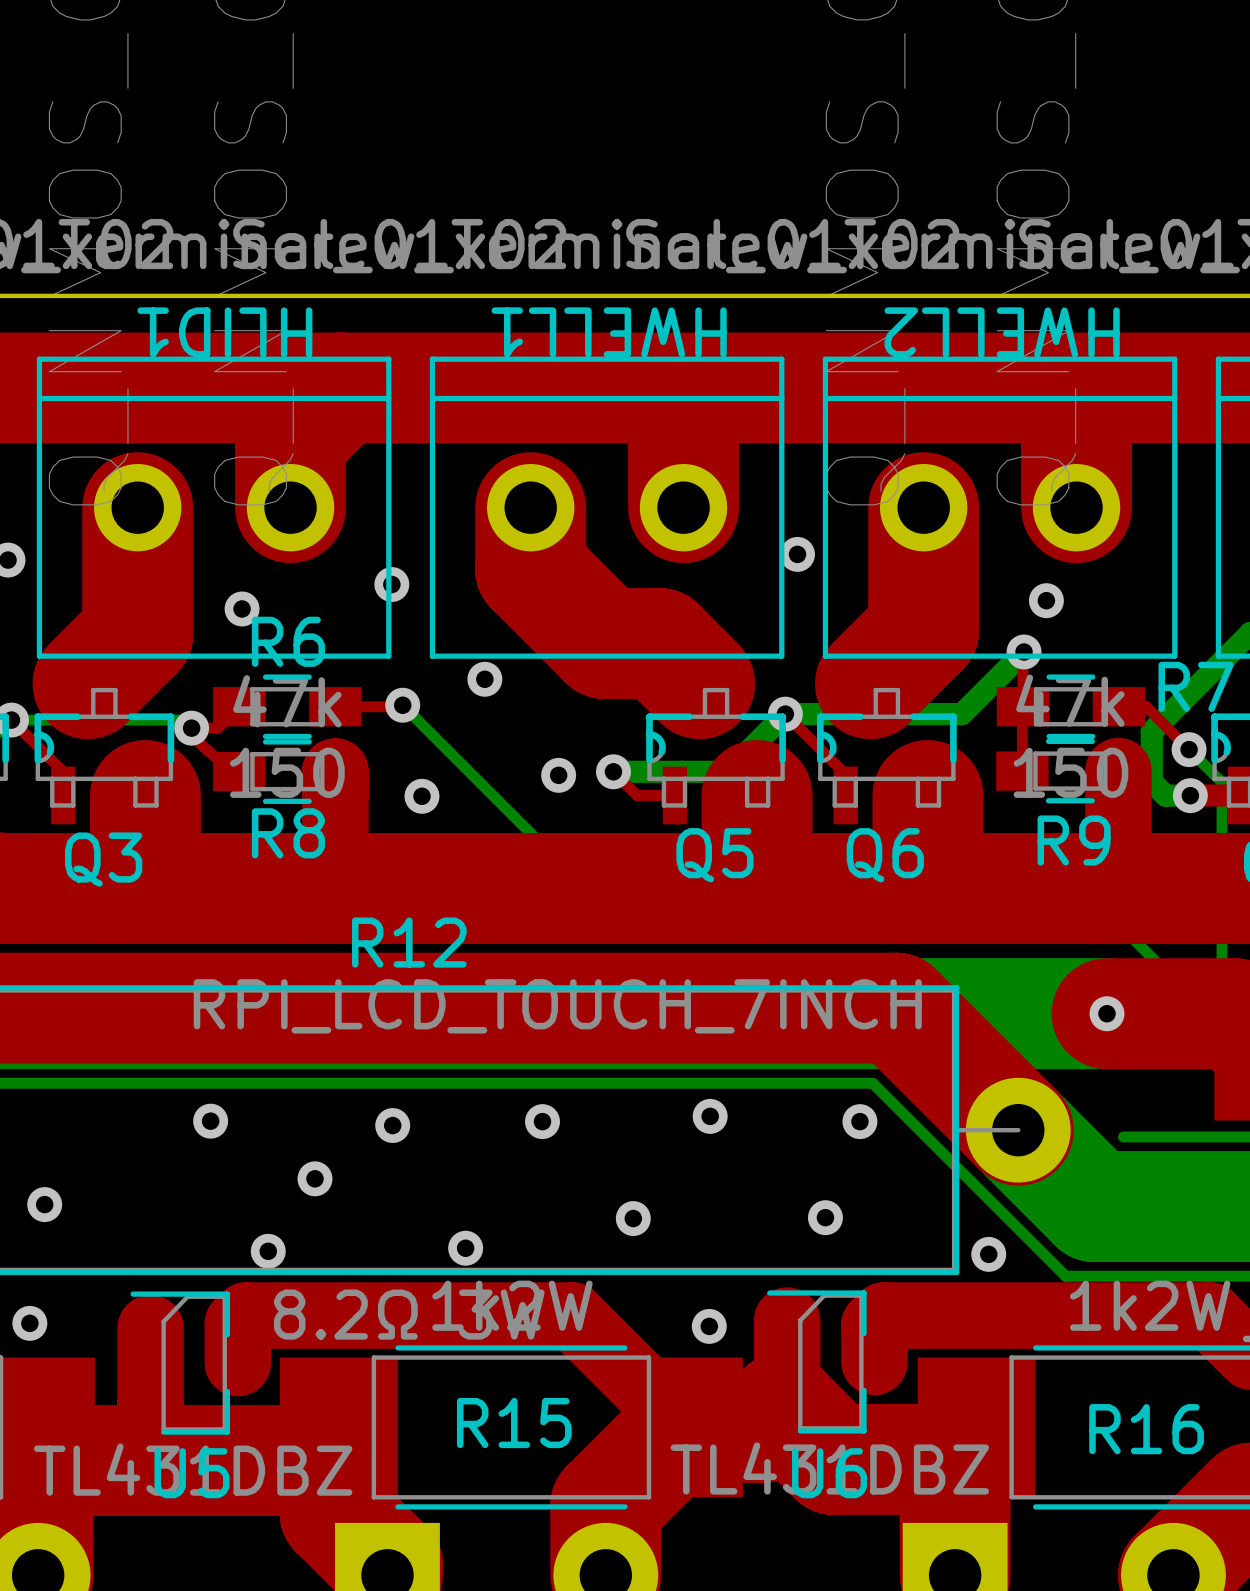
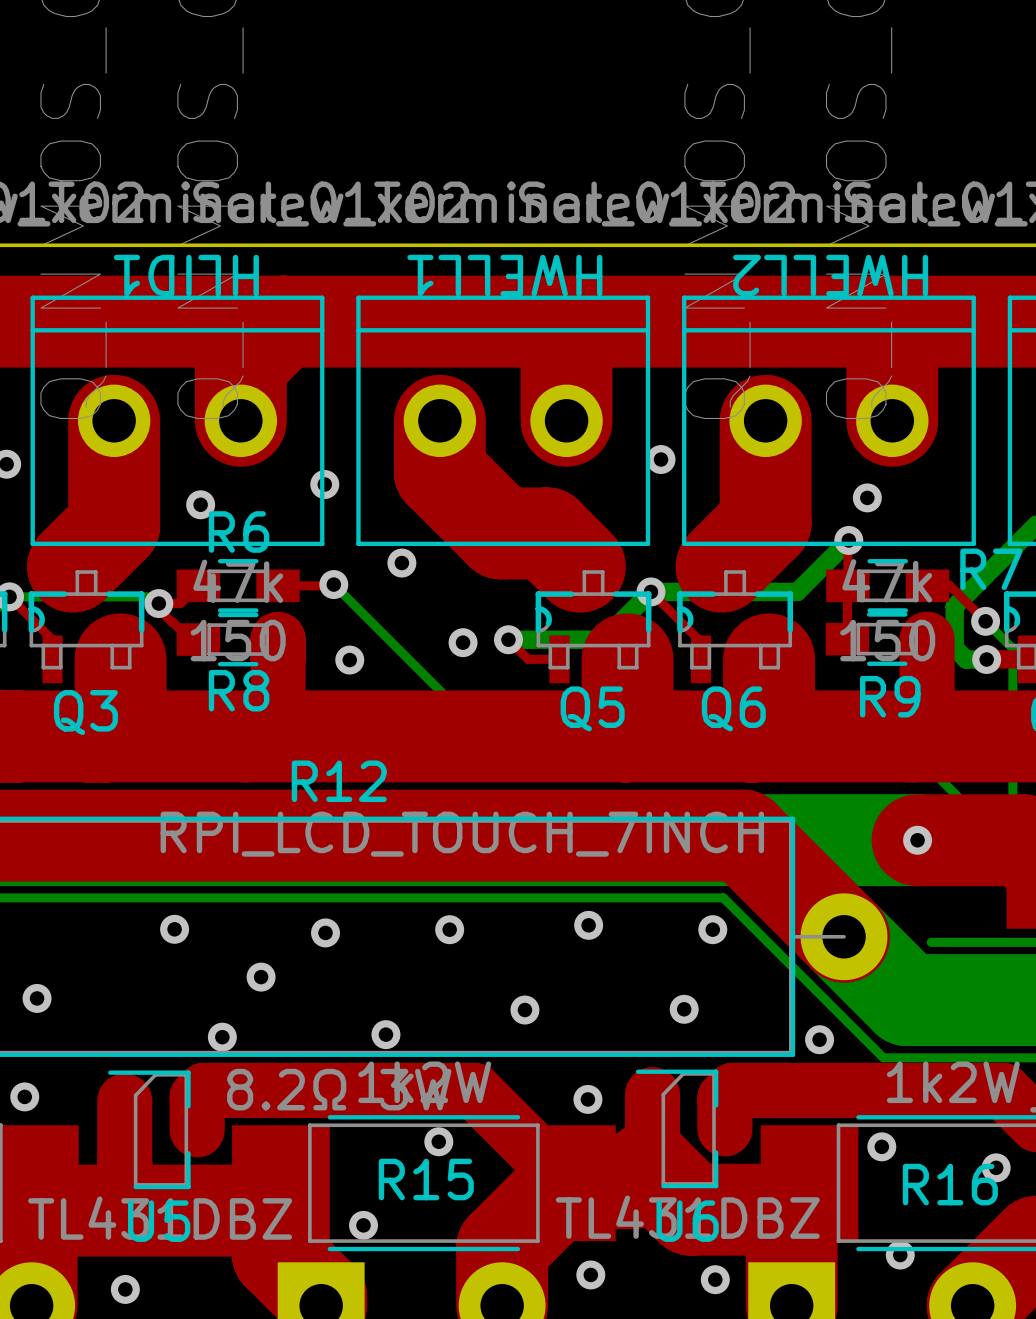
via: none -> (438, 1141)
via: none -> (881, 1146)
via: none -> (996, 1167)
via: none -> (363, 1225)
via: none -> (900, 1255)
via: none -> (590, 1274)
via: none -> (715, 1279)
via: none -> (125, 1289)

